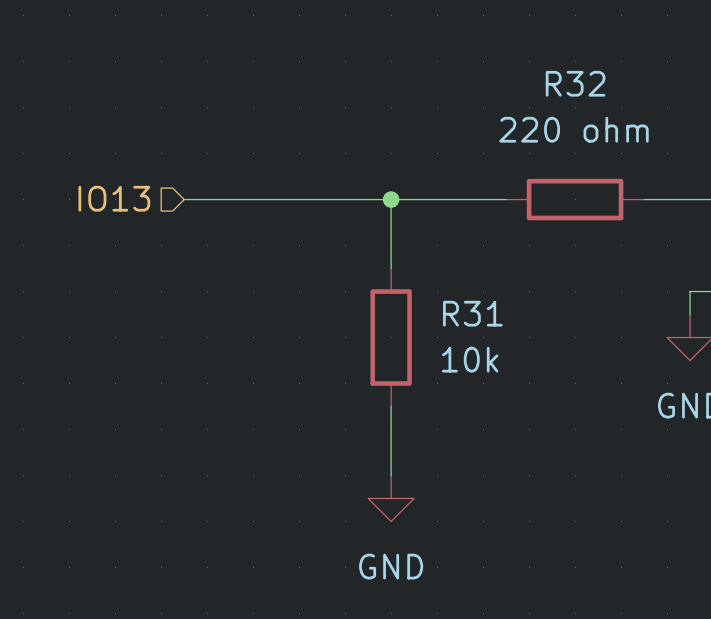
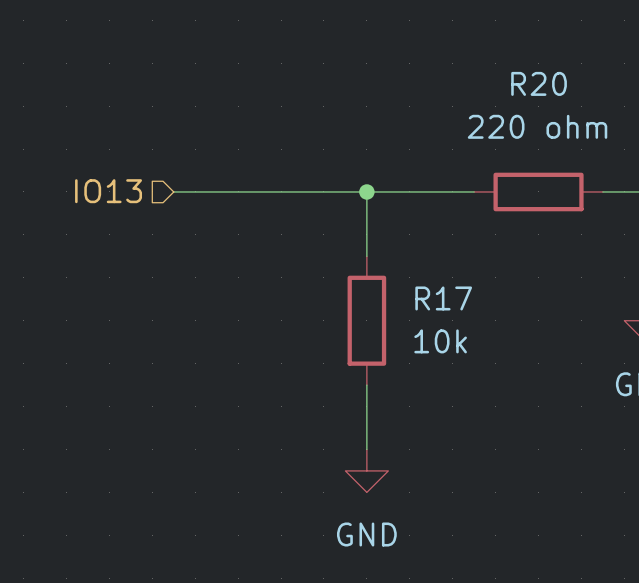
R32 name: R32 (575, 83) -> R20 (539, 83)
R31 name: R31 (472, 313) -> R17 (443, 298)

